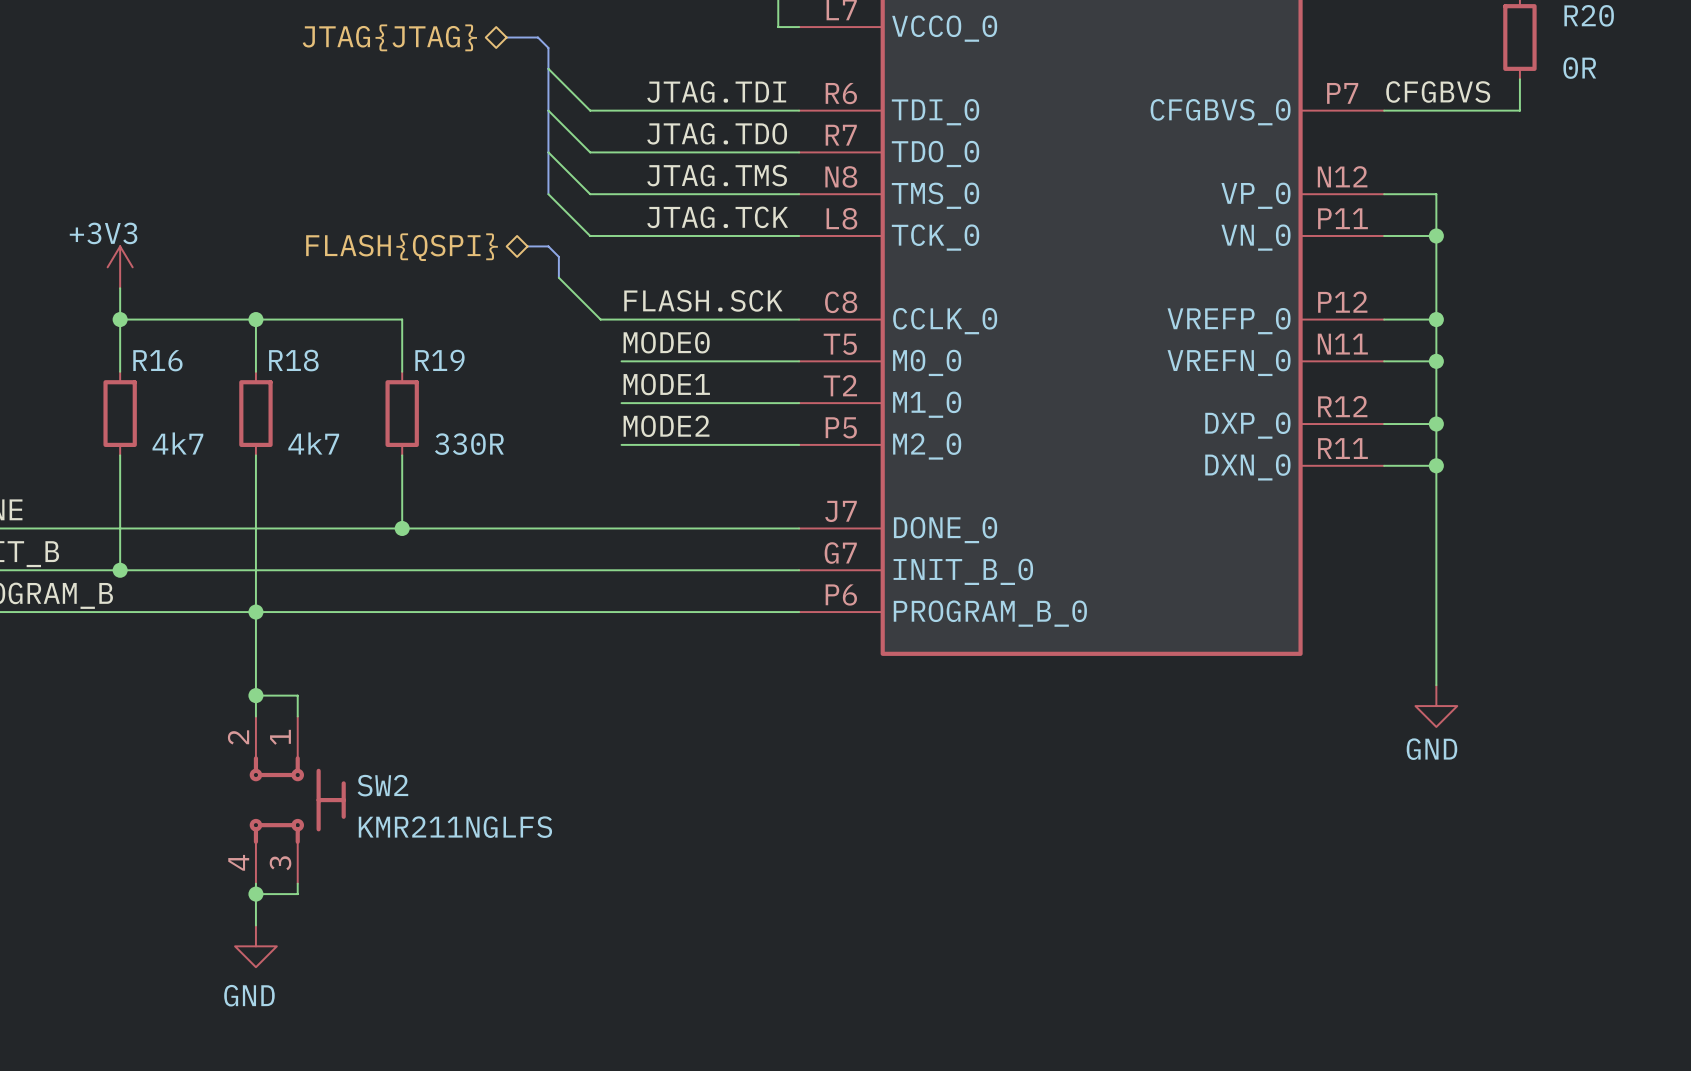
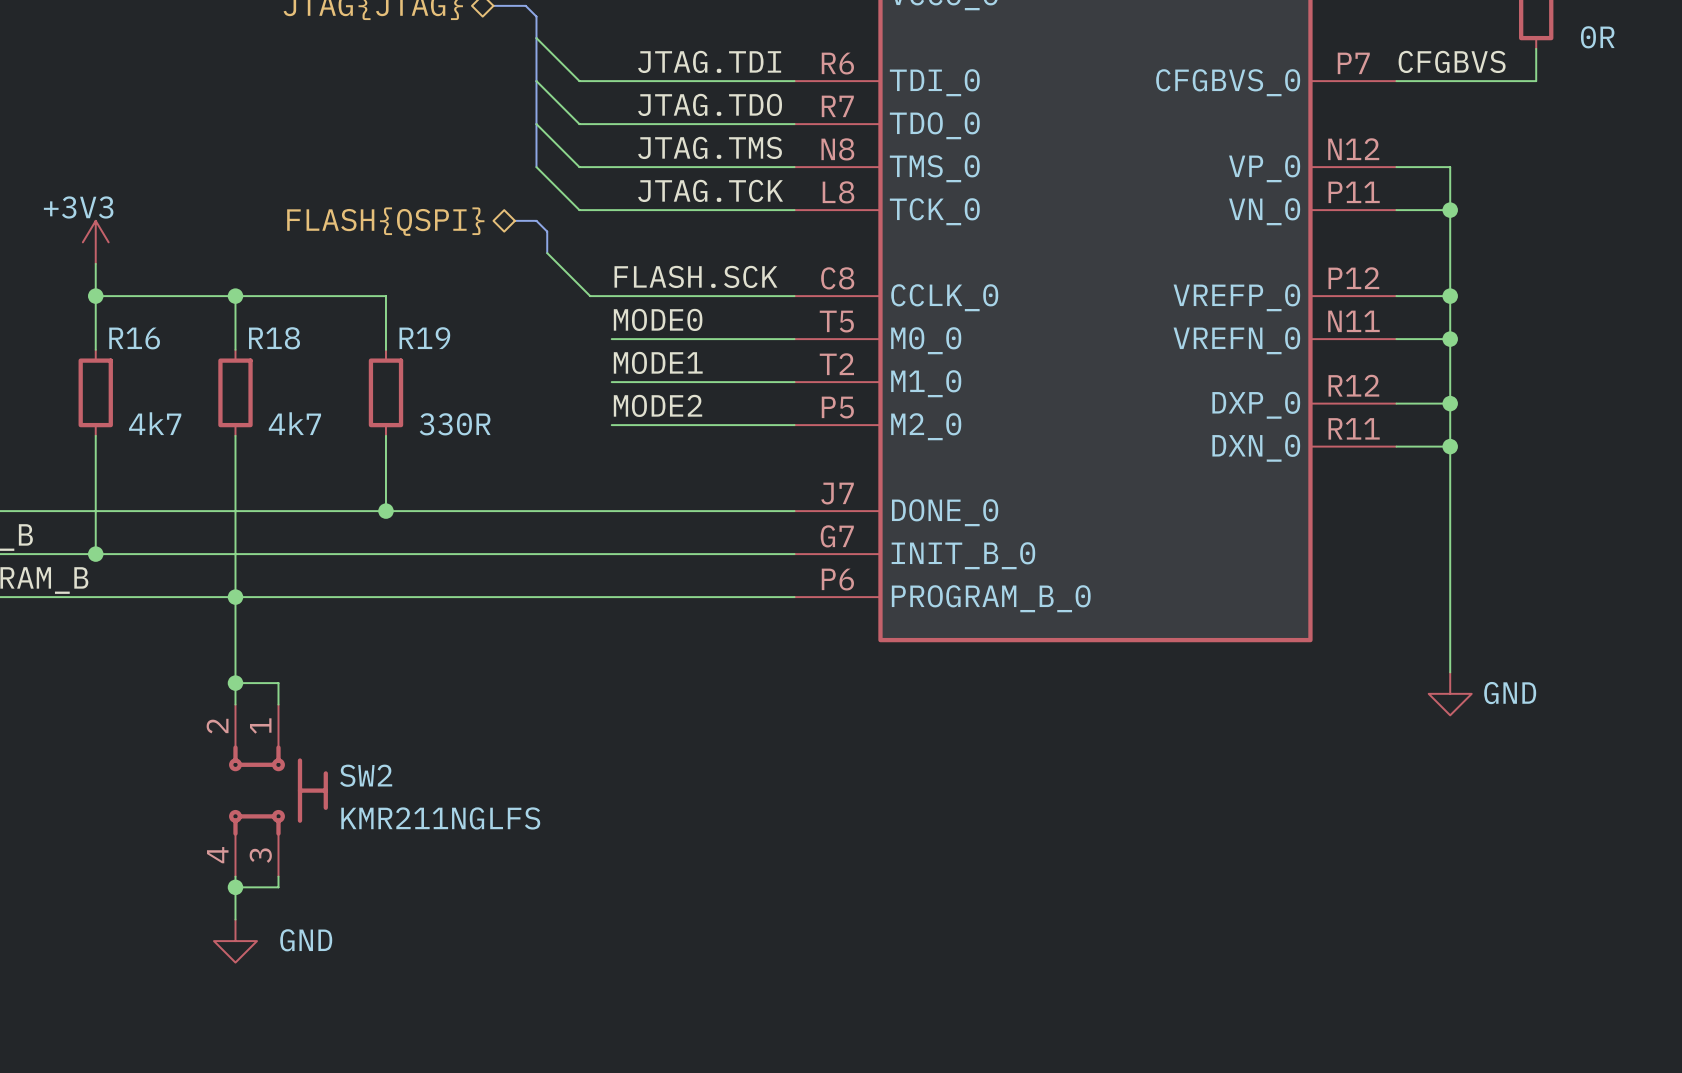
power symbol text position: GND (1431, 749) -> GND (1510, 693)
power symbol text position: GND (249, 995) -> GND (306, 940)

